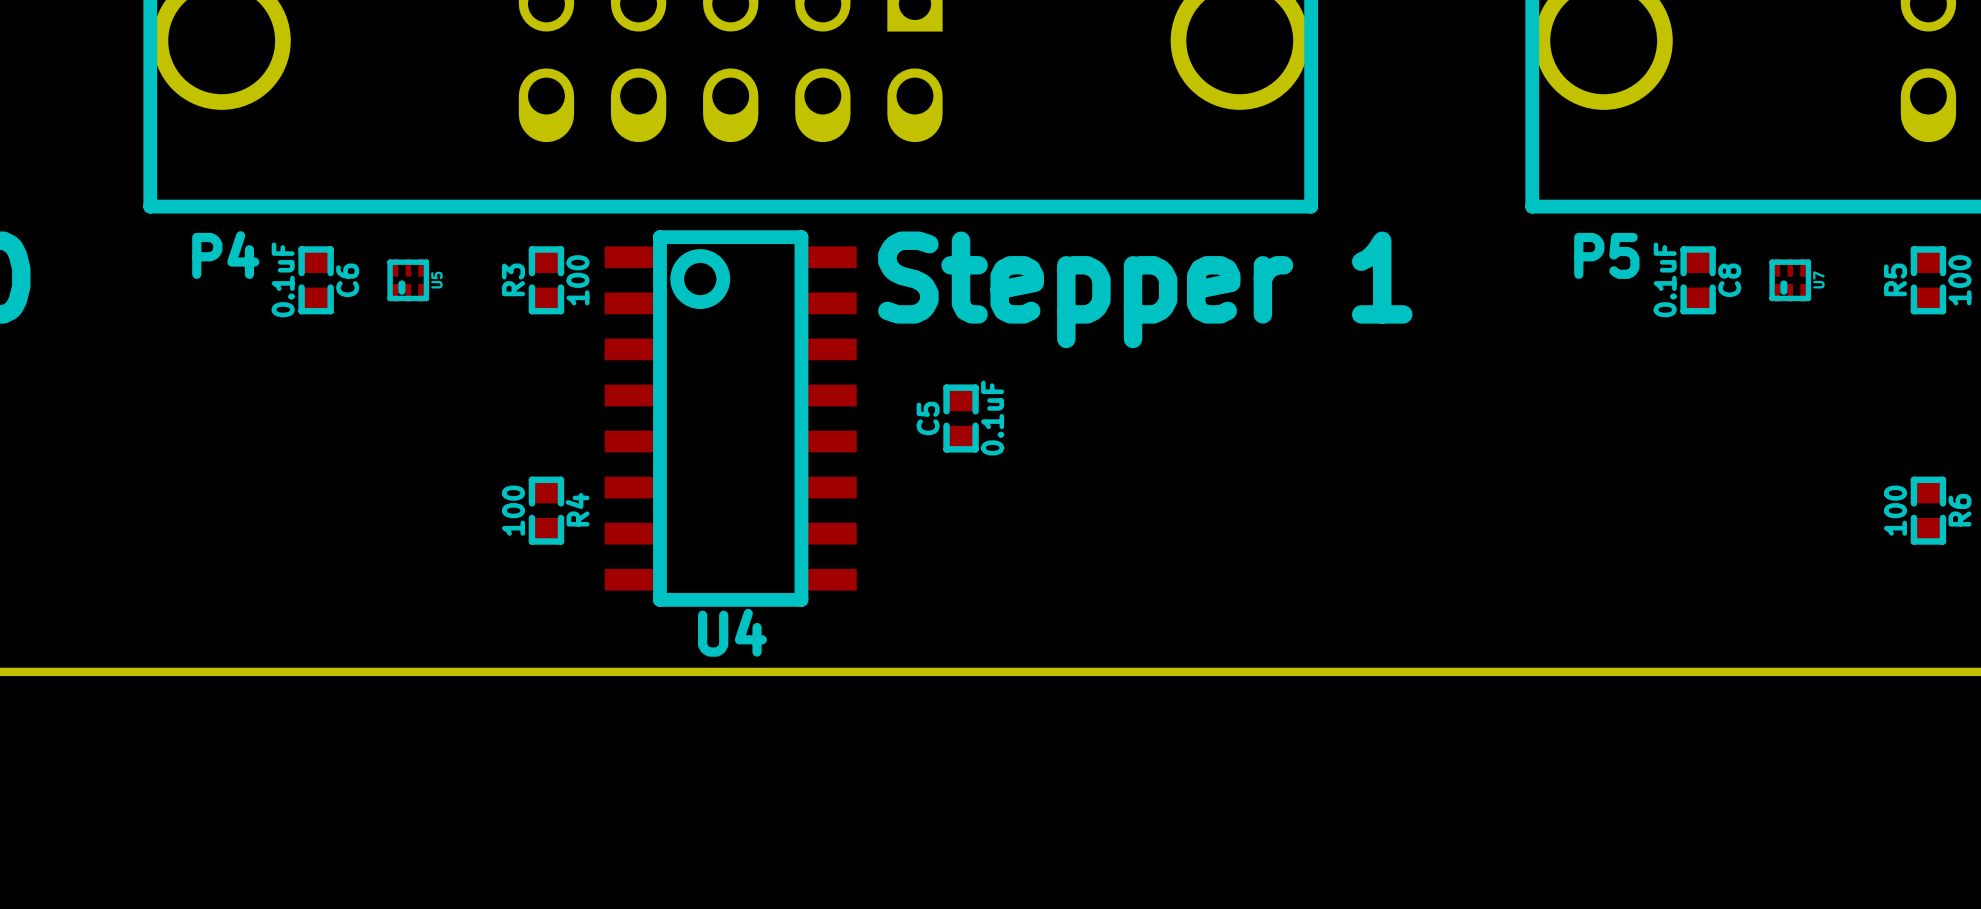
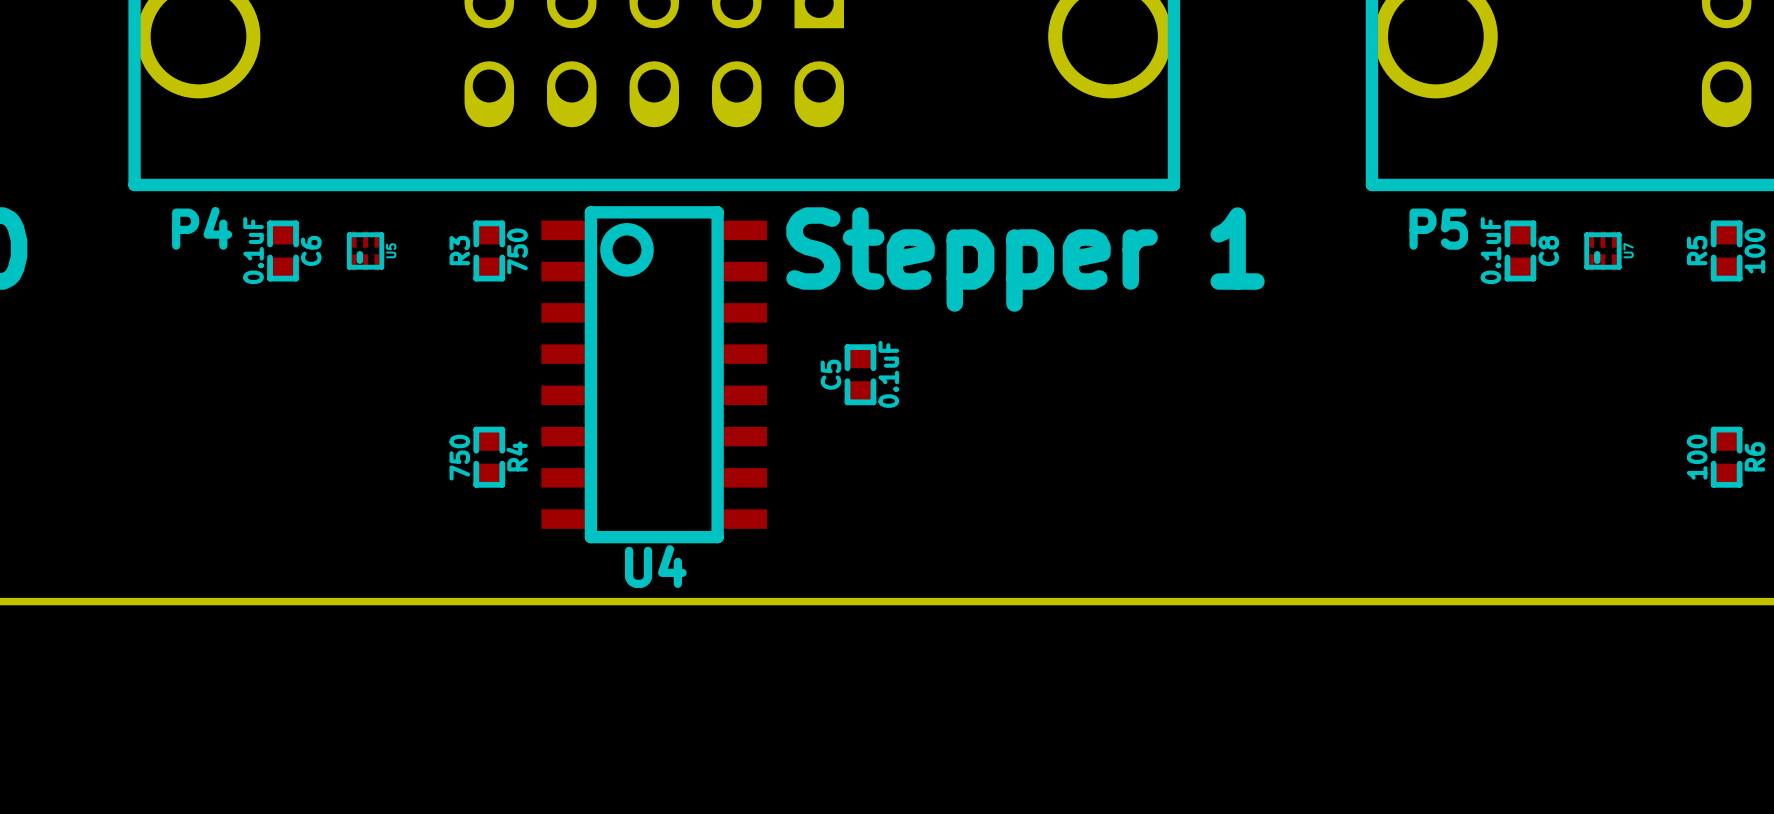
R3 value: 100 (578, 280) -> 750 (517, 251)
R4 value: 100 (513, 510) -> 750 (459, 457)

